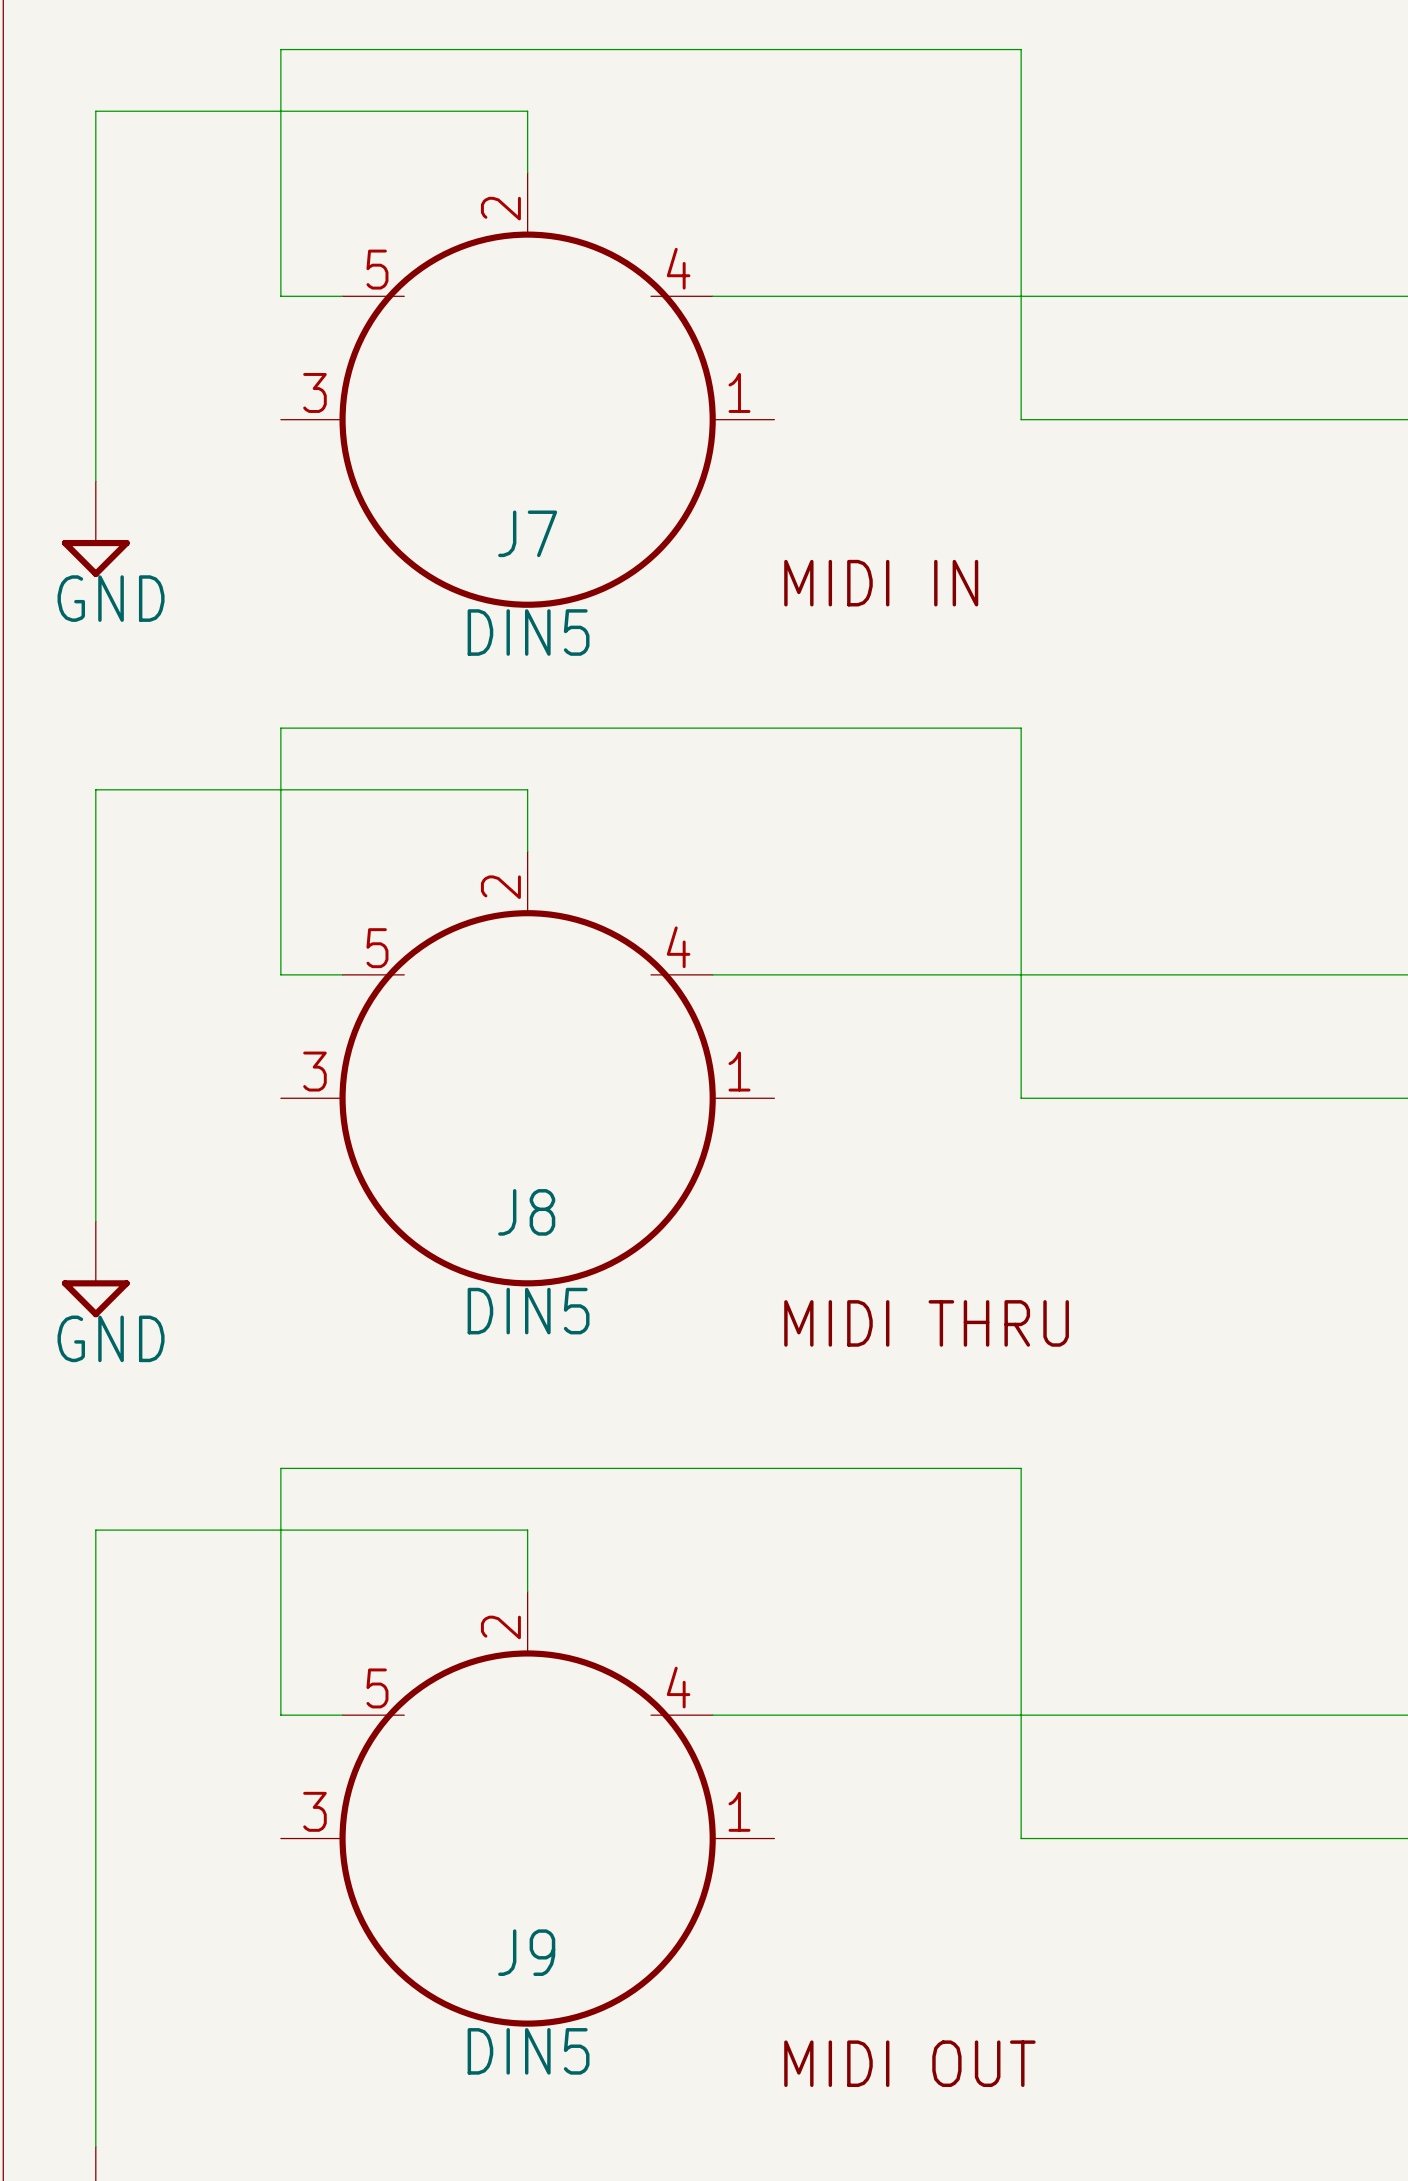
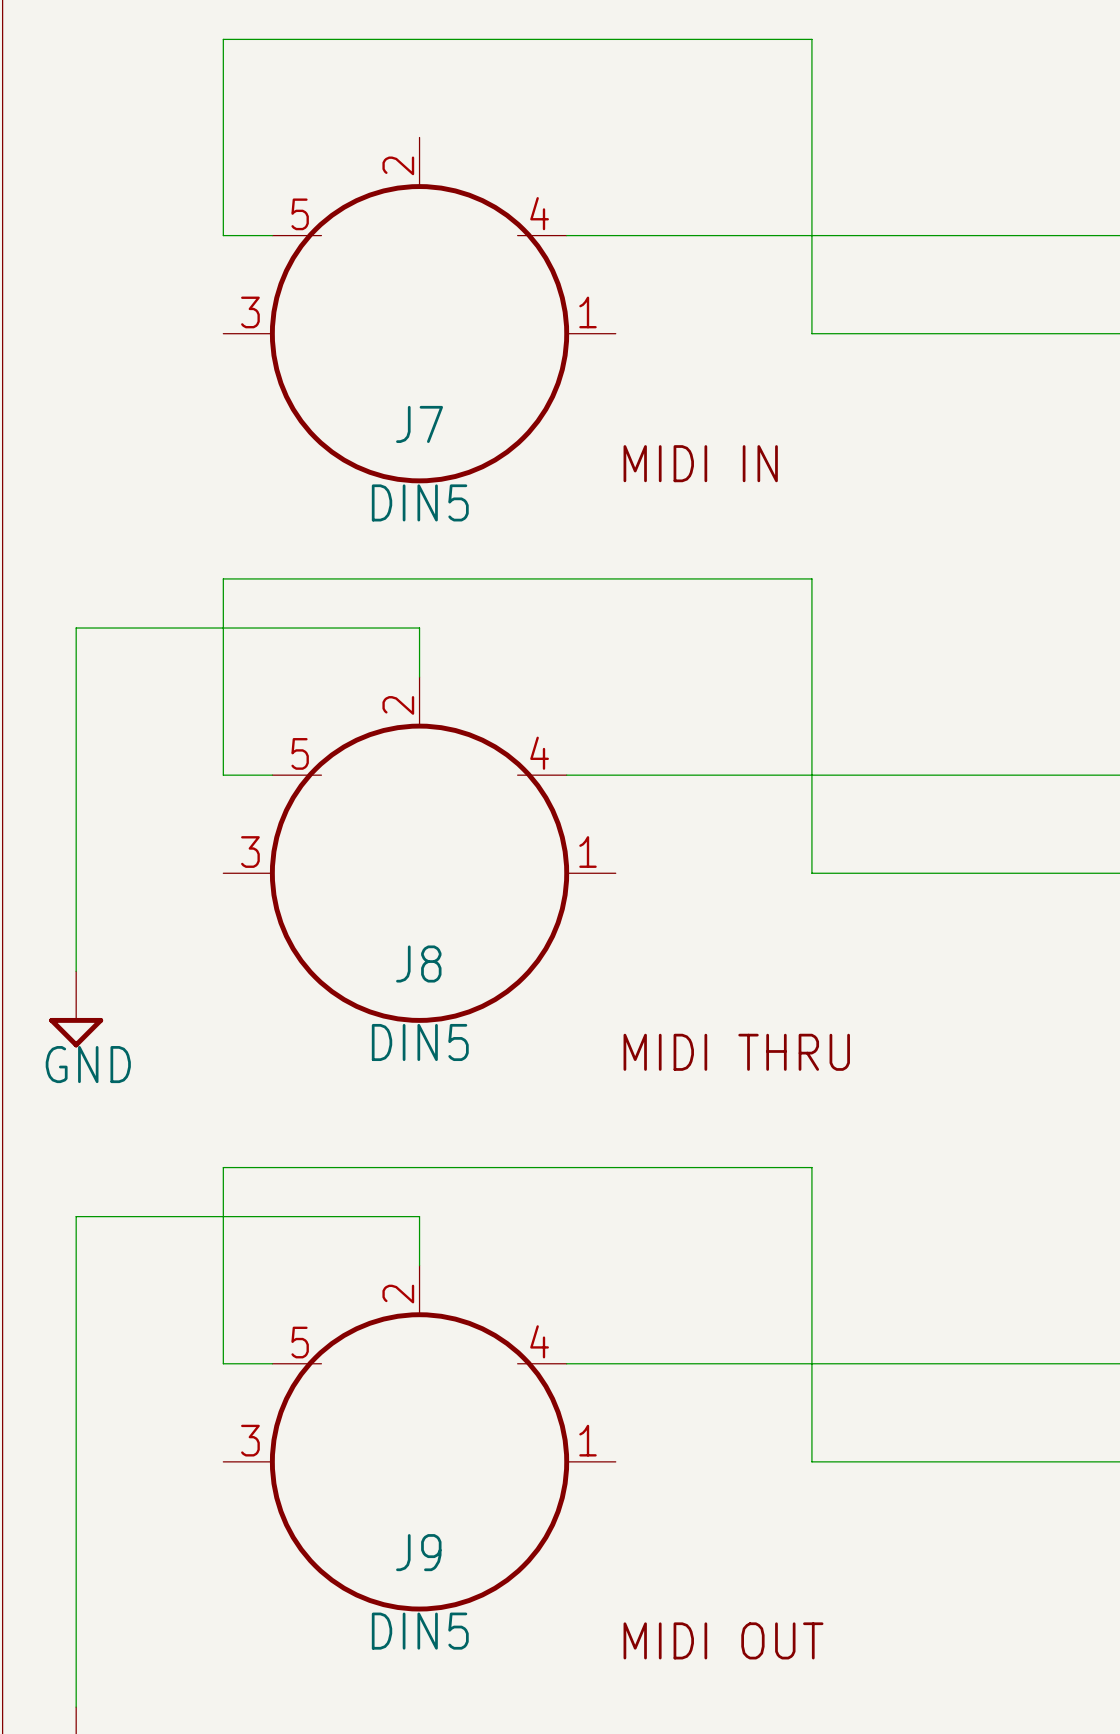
wire: (527, 172) (527, 111) (95, 111) (95, 481) -> none
power symbol: GND (95, 529) -> none

